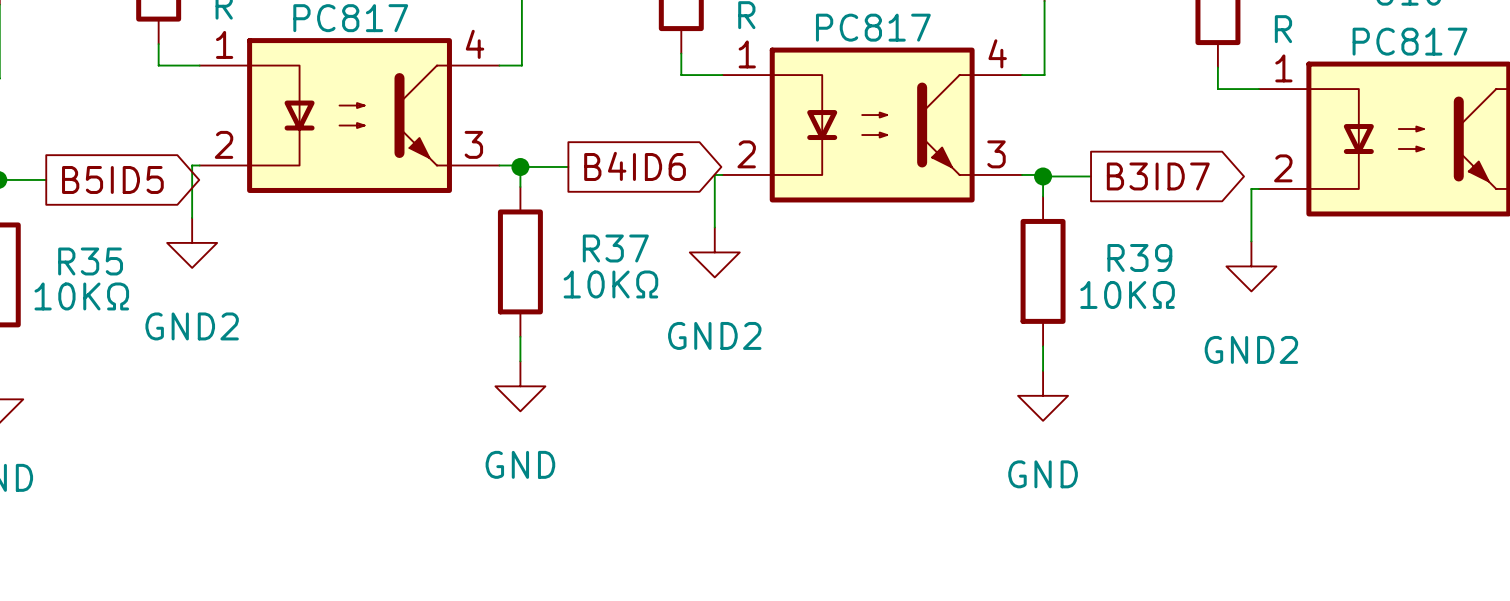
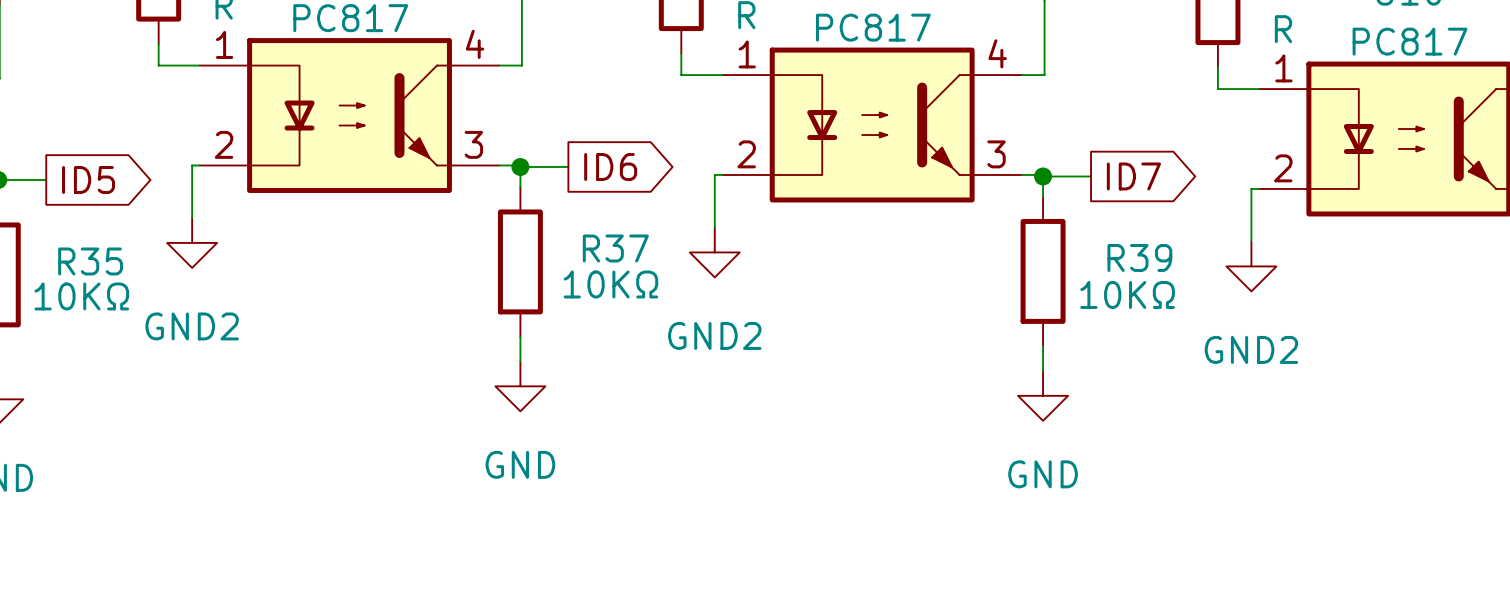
global label: B4ID6 (635, 166) -> ID6 (610, 166)
global label: B3ID7 (1158, 176) -> ID7 (1133, 176)
global label: B5ID5 (112, 179) -> ID5 (88, 179)

